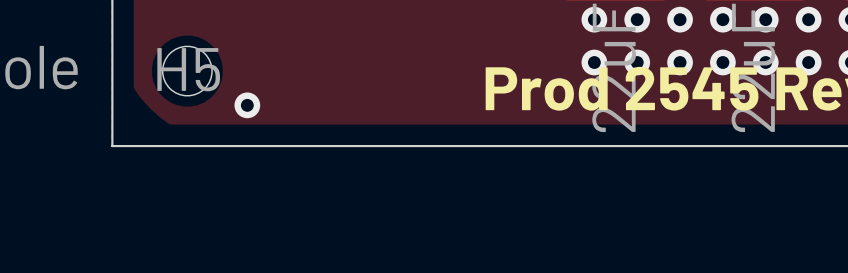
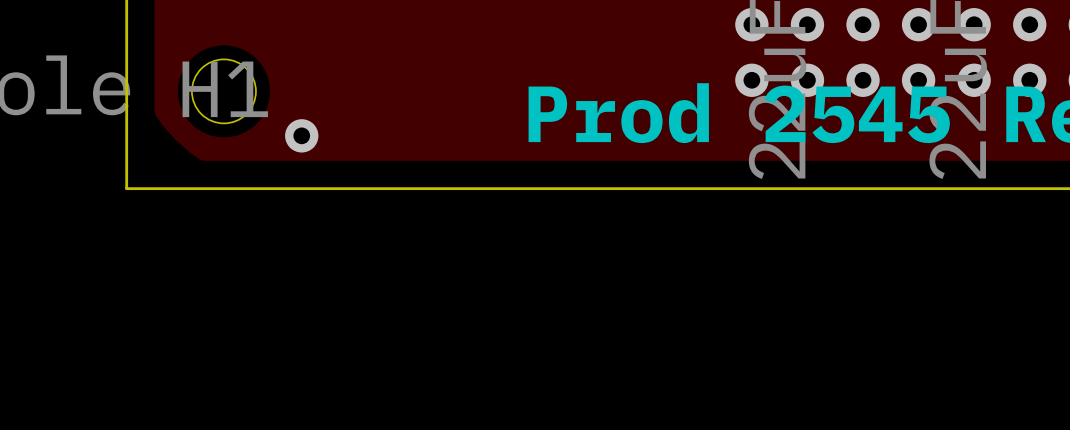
H5 name: H5 (188, 69) -> H1 (225, 89)

